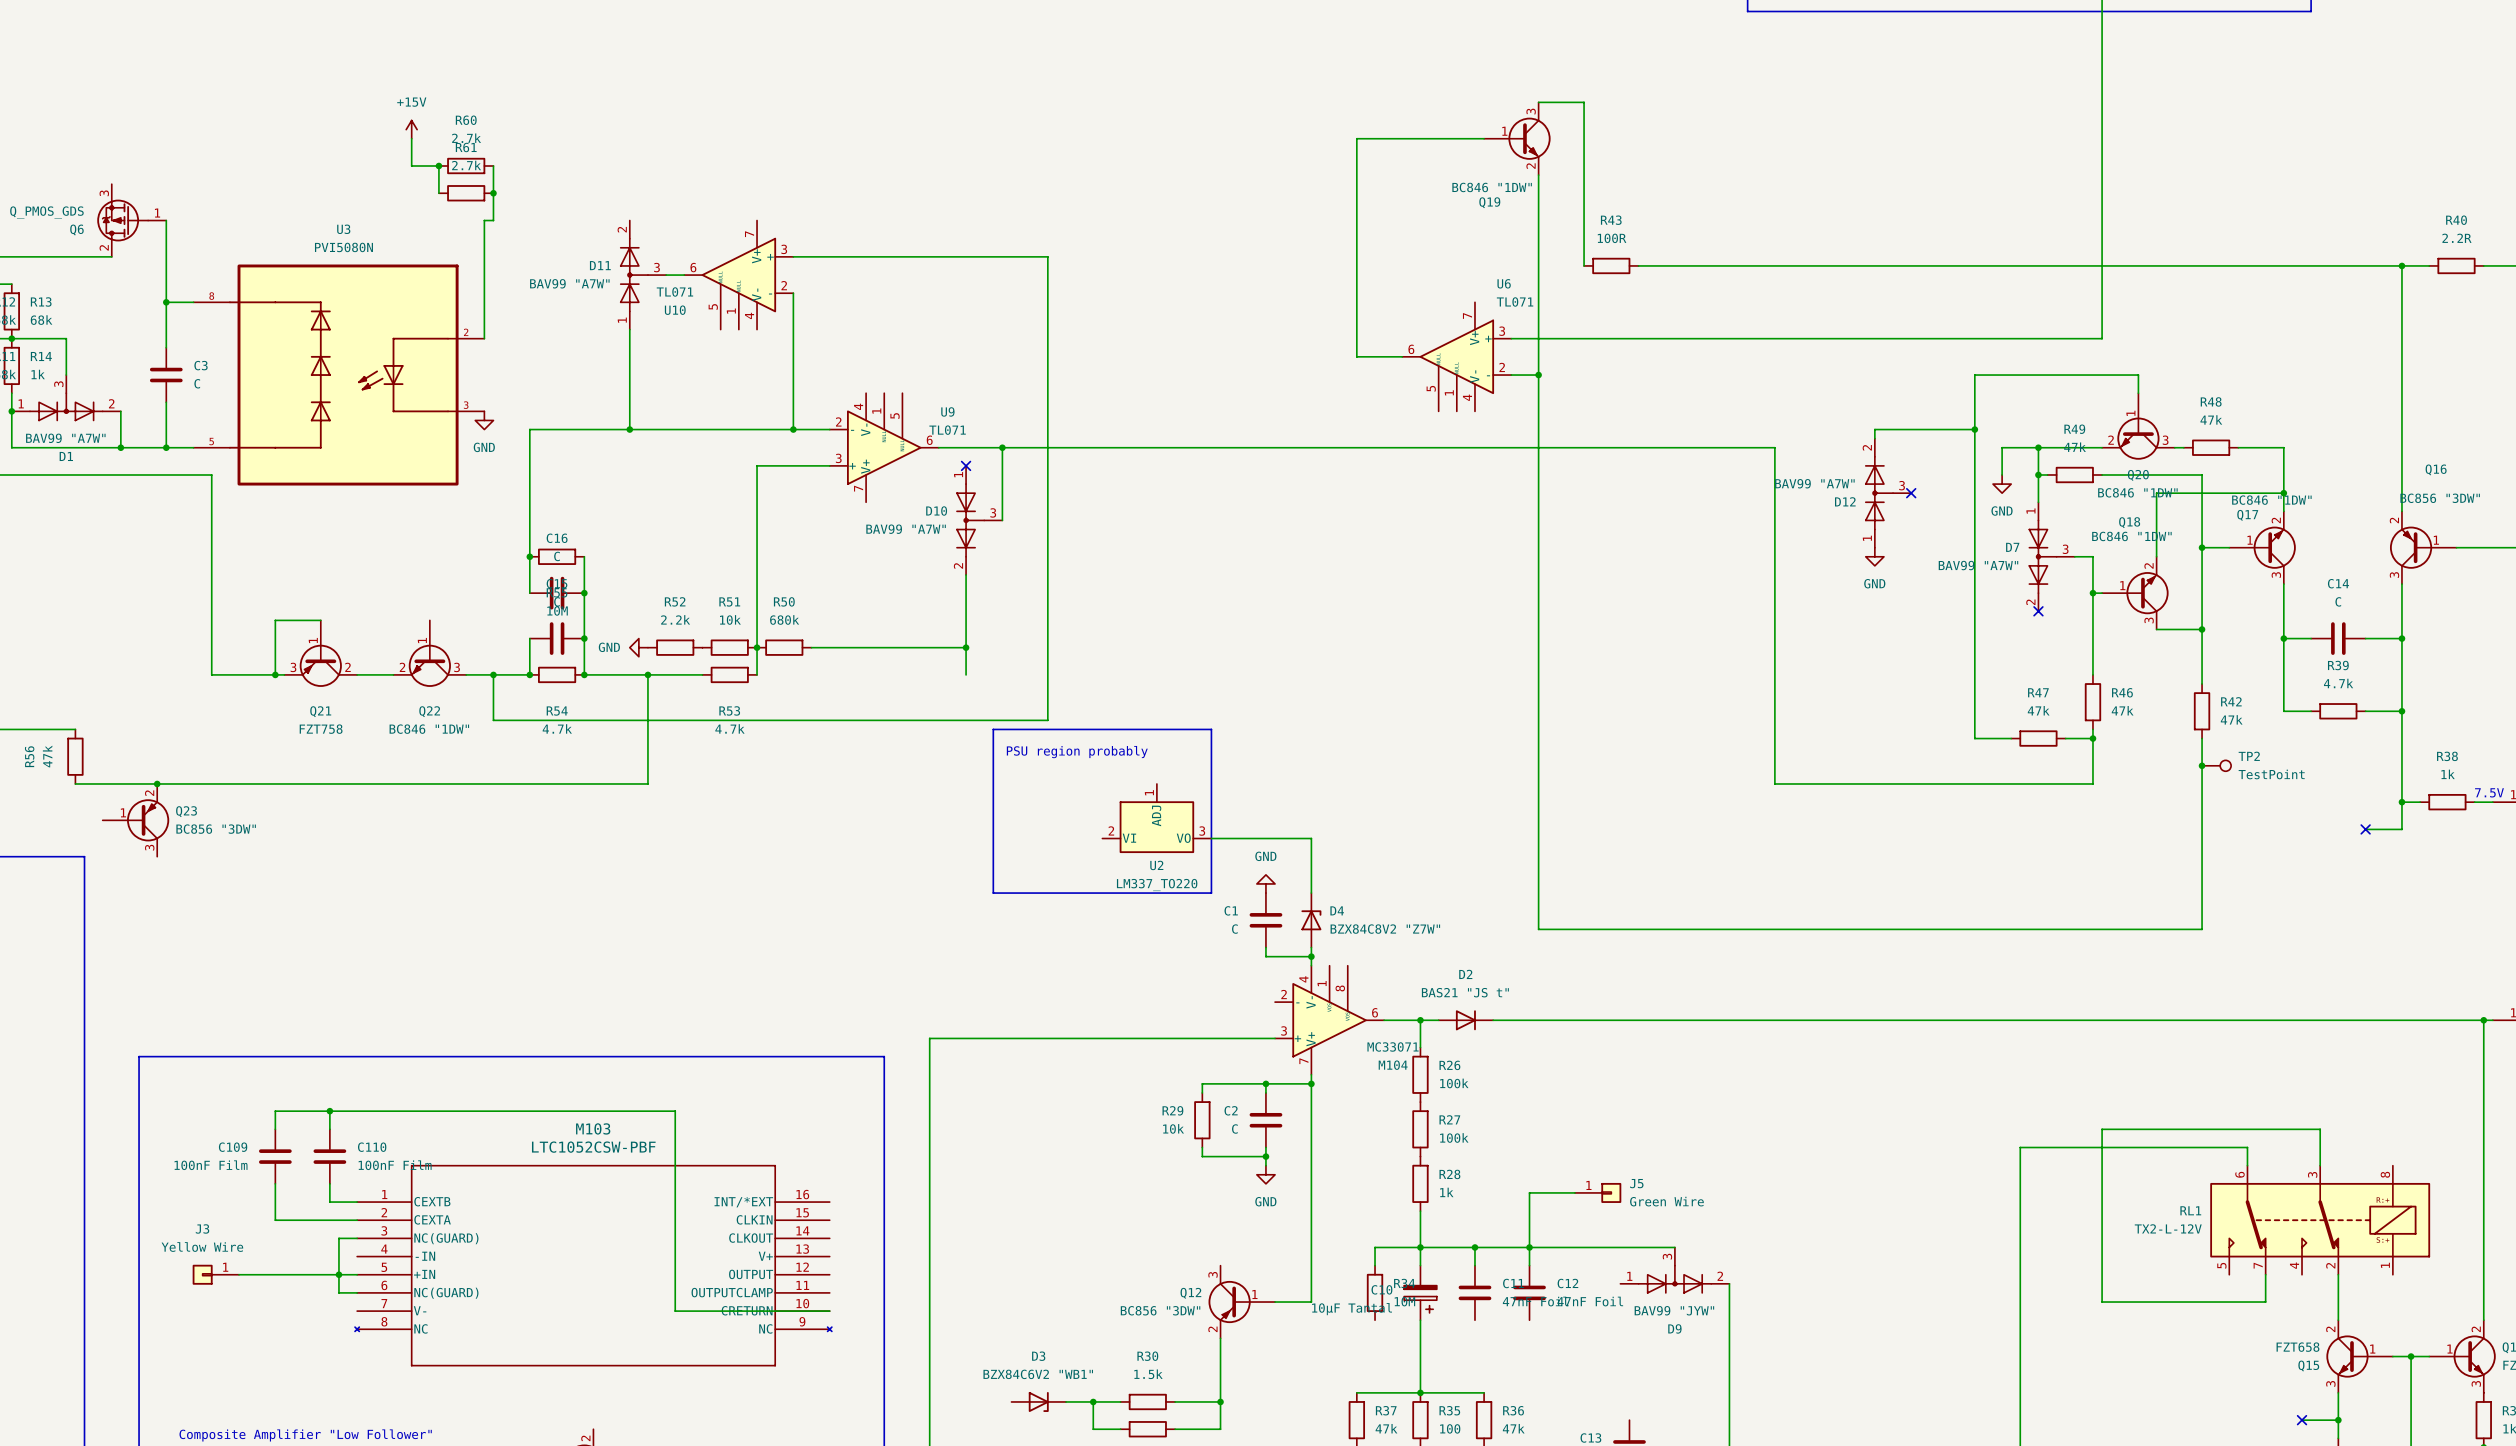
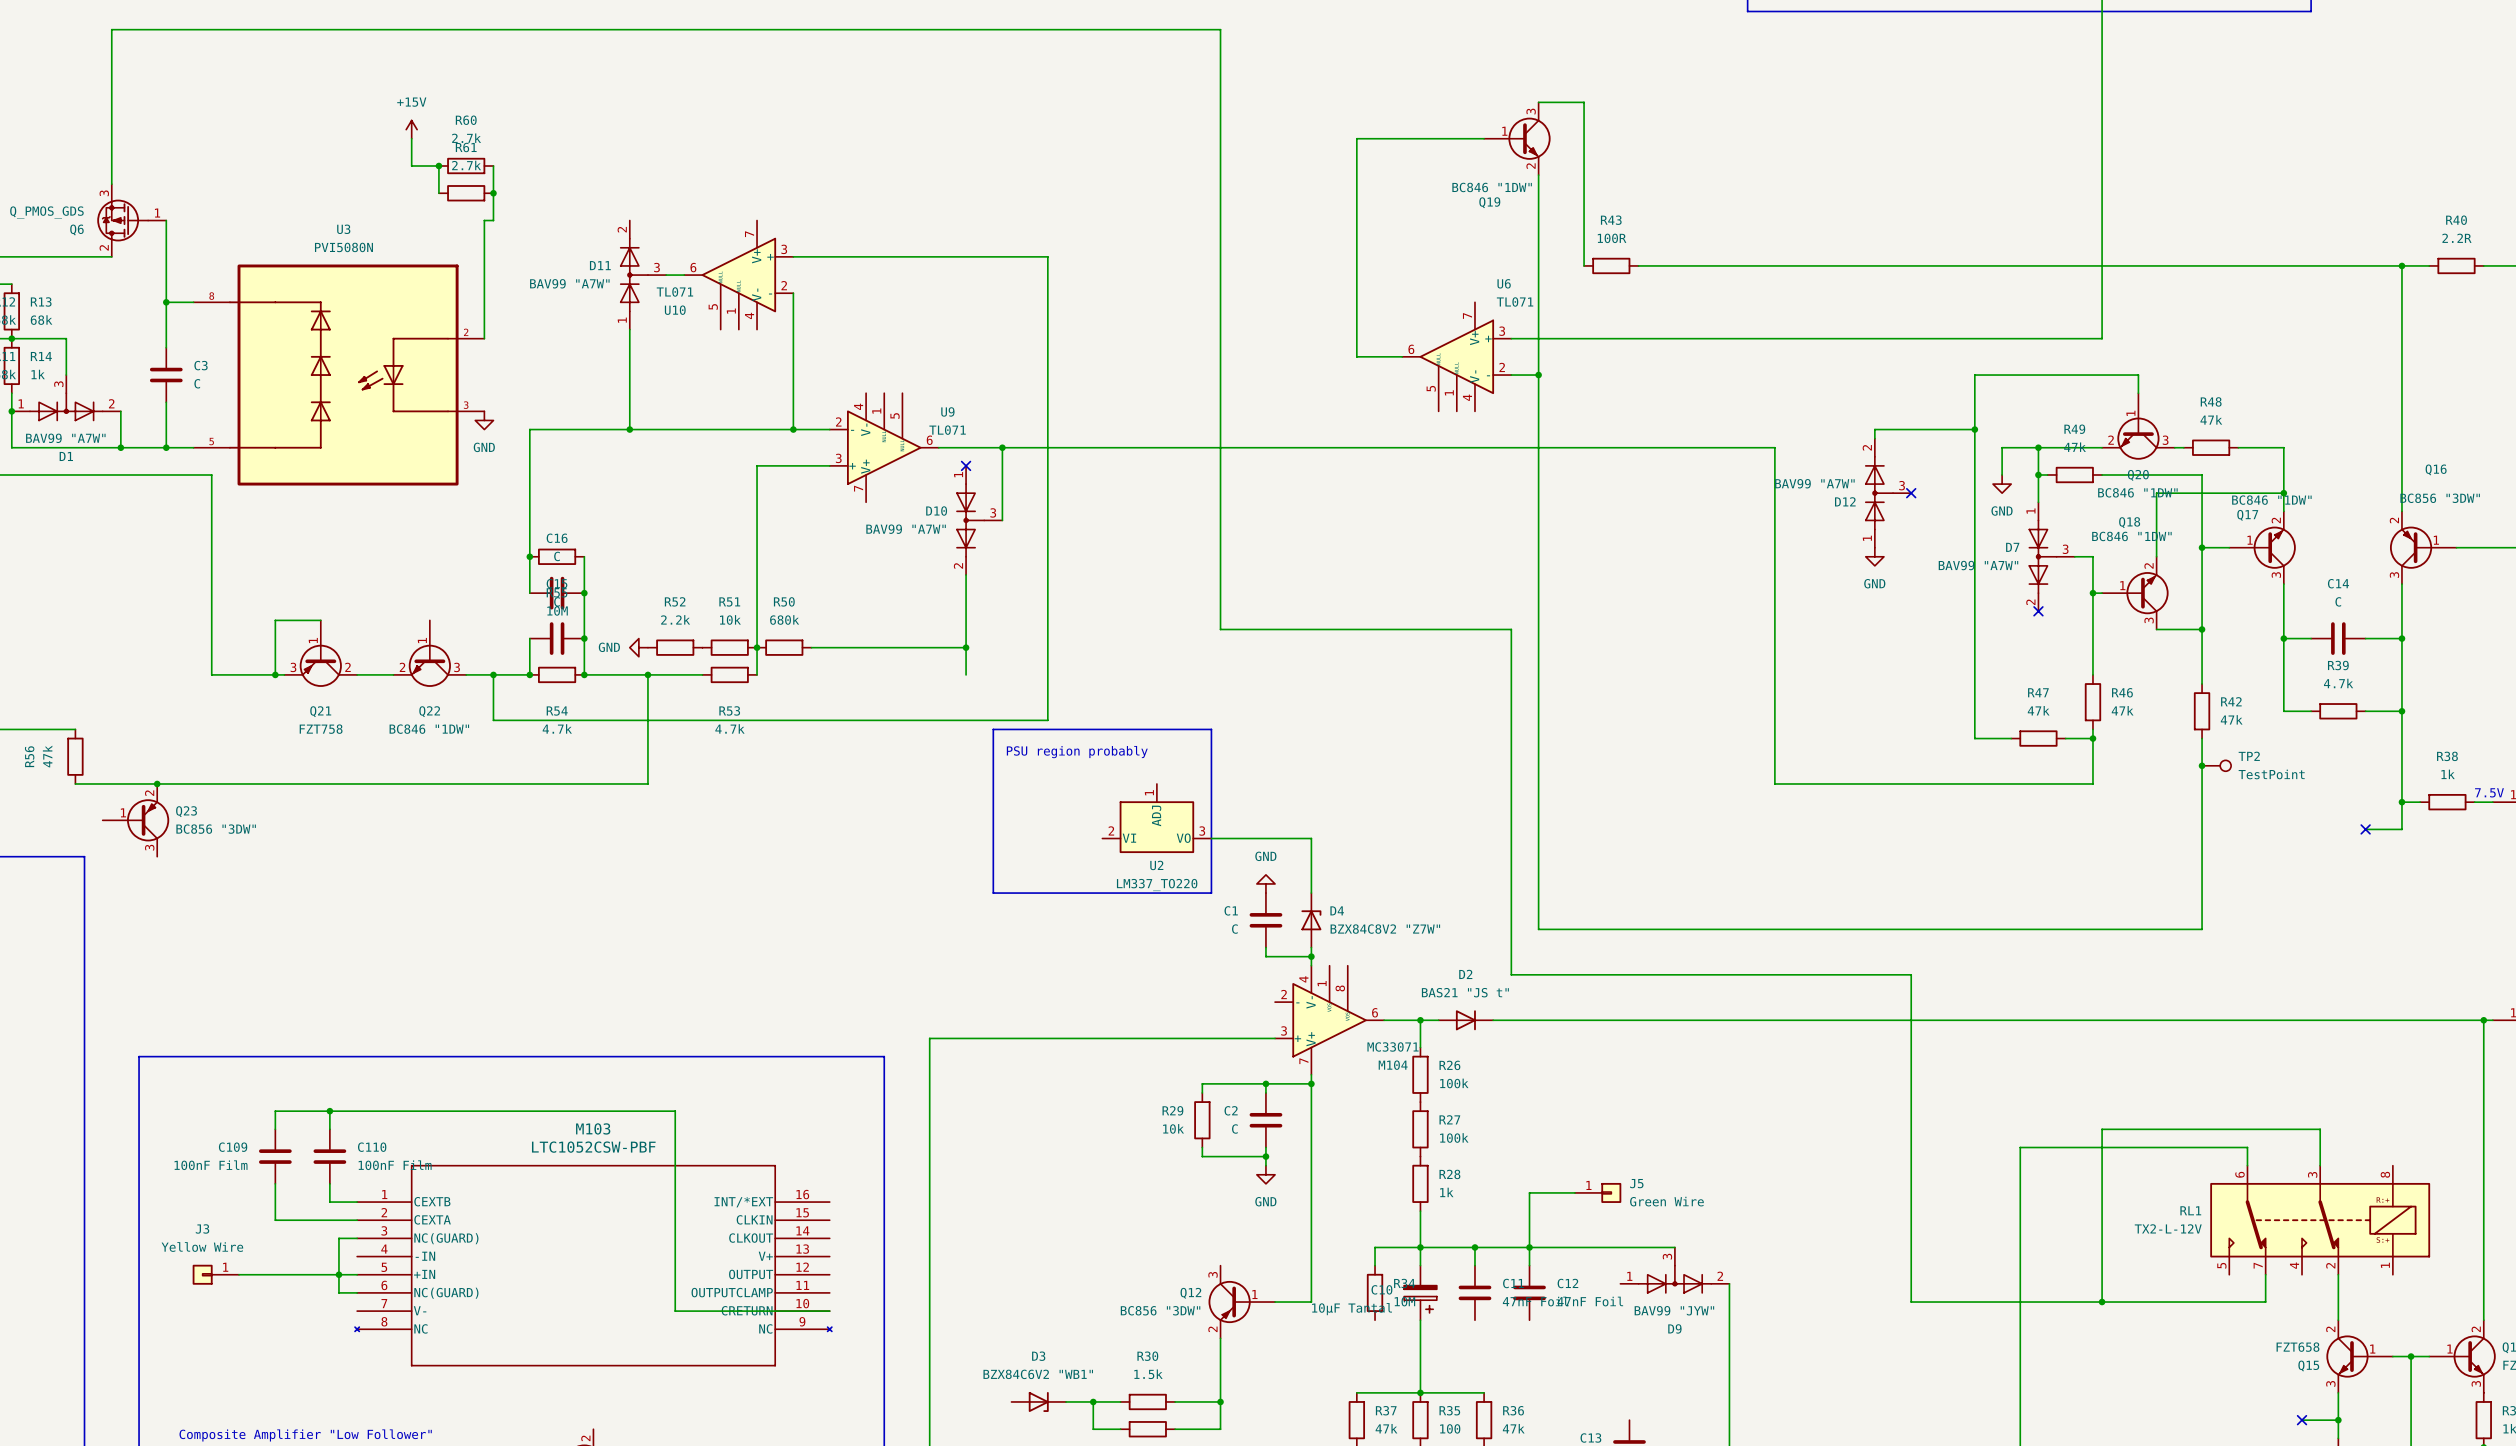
wire: none -> (111, 184) (111, 29) (1220, 29) (1220, 629) (1511, 629) (1511, 974) (1911, 974) (1911, 1302) (2102, 1302)
junction: none -> (2102, 1302)

